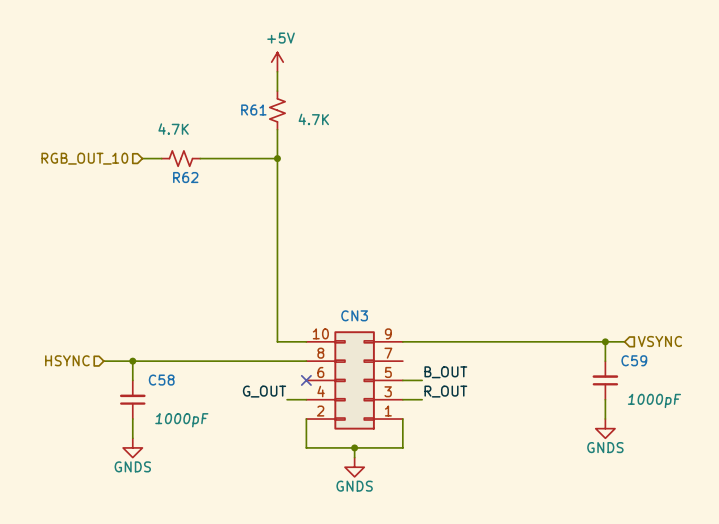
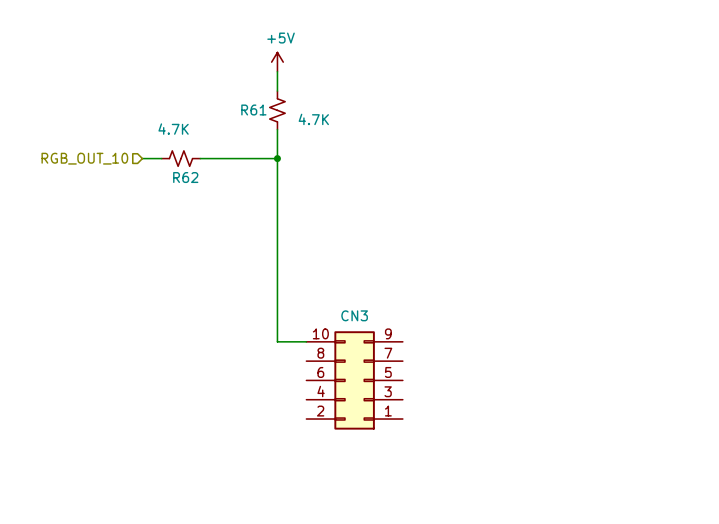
wire: (402, 341) (624, 341) -> none
wire: (605, 341) (605, 361) -> none
junction: (605, 341) -> none
hierarchical label: VSYNC (659, 341) -> none
hierarchical label: HSYNC (67, 360) -> none
wire: (103, 361) (306, 361) -> none
wire: (132, 361) (132, 380) -> none
junction: (132, 361) -> none
label: B_OUT (445, 372) -> none
no-connect mark: (306, 380) -> none
wire: (402, 380) (422, 380) -> none
C59: 1000pF (605, 380) -> none
label: G_OUT (264, 391) -> none
label: R_OUT (445, 391) -> none
C58: 1000pF (132, 399) -> none
wire: (287, 399) (306, 399) -> none
wire: (402, 399) (422, 399) -> none
wire: (605, 399) (605, 419) -> none
wire: (132, 419) (132, 438) -> none
wire: (306, 419) (306, 447) (402, 447) (402, 419) -> none
power symbol: GNDS (605, 428) -> none
power symbol: GNDS (132, 447) -> none
wire: (354, 447) (354, 457) -> none
junction: (354, 447) -> none
power symbol: GNDS (354, 467) -> none

